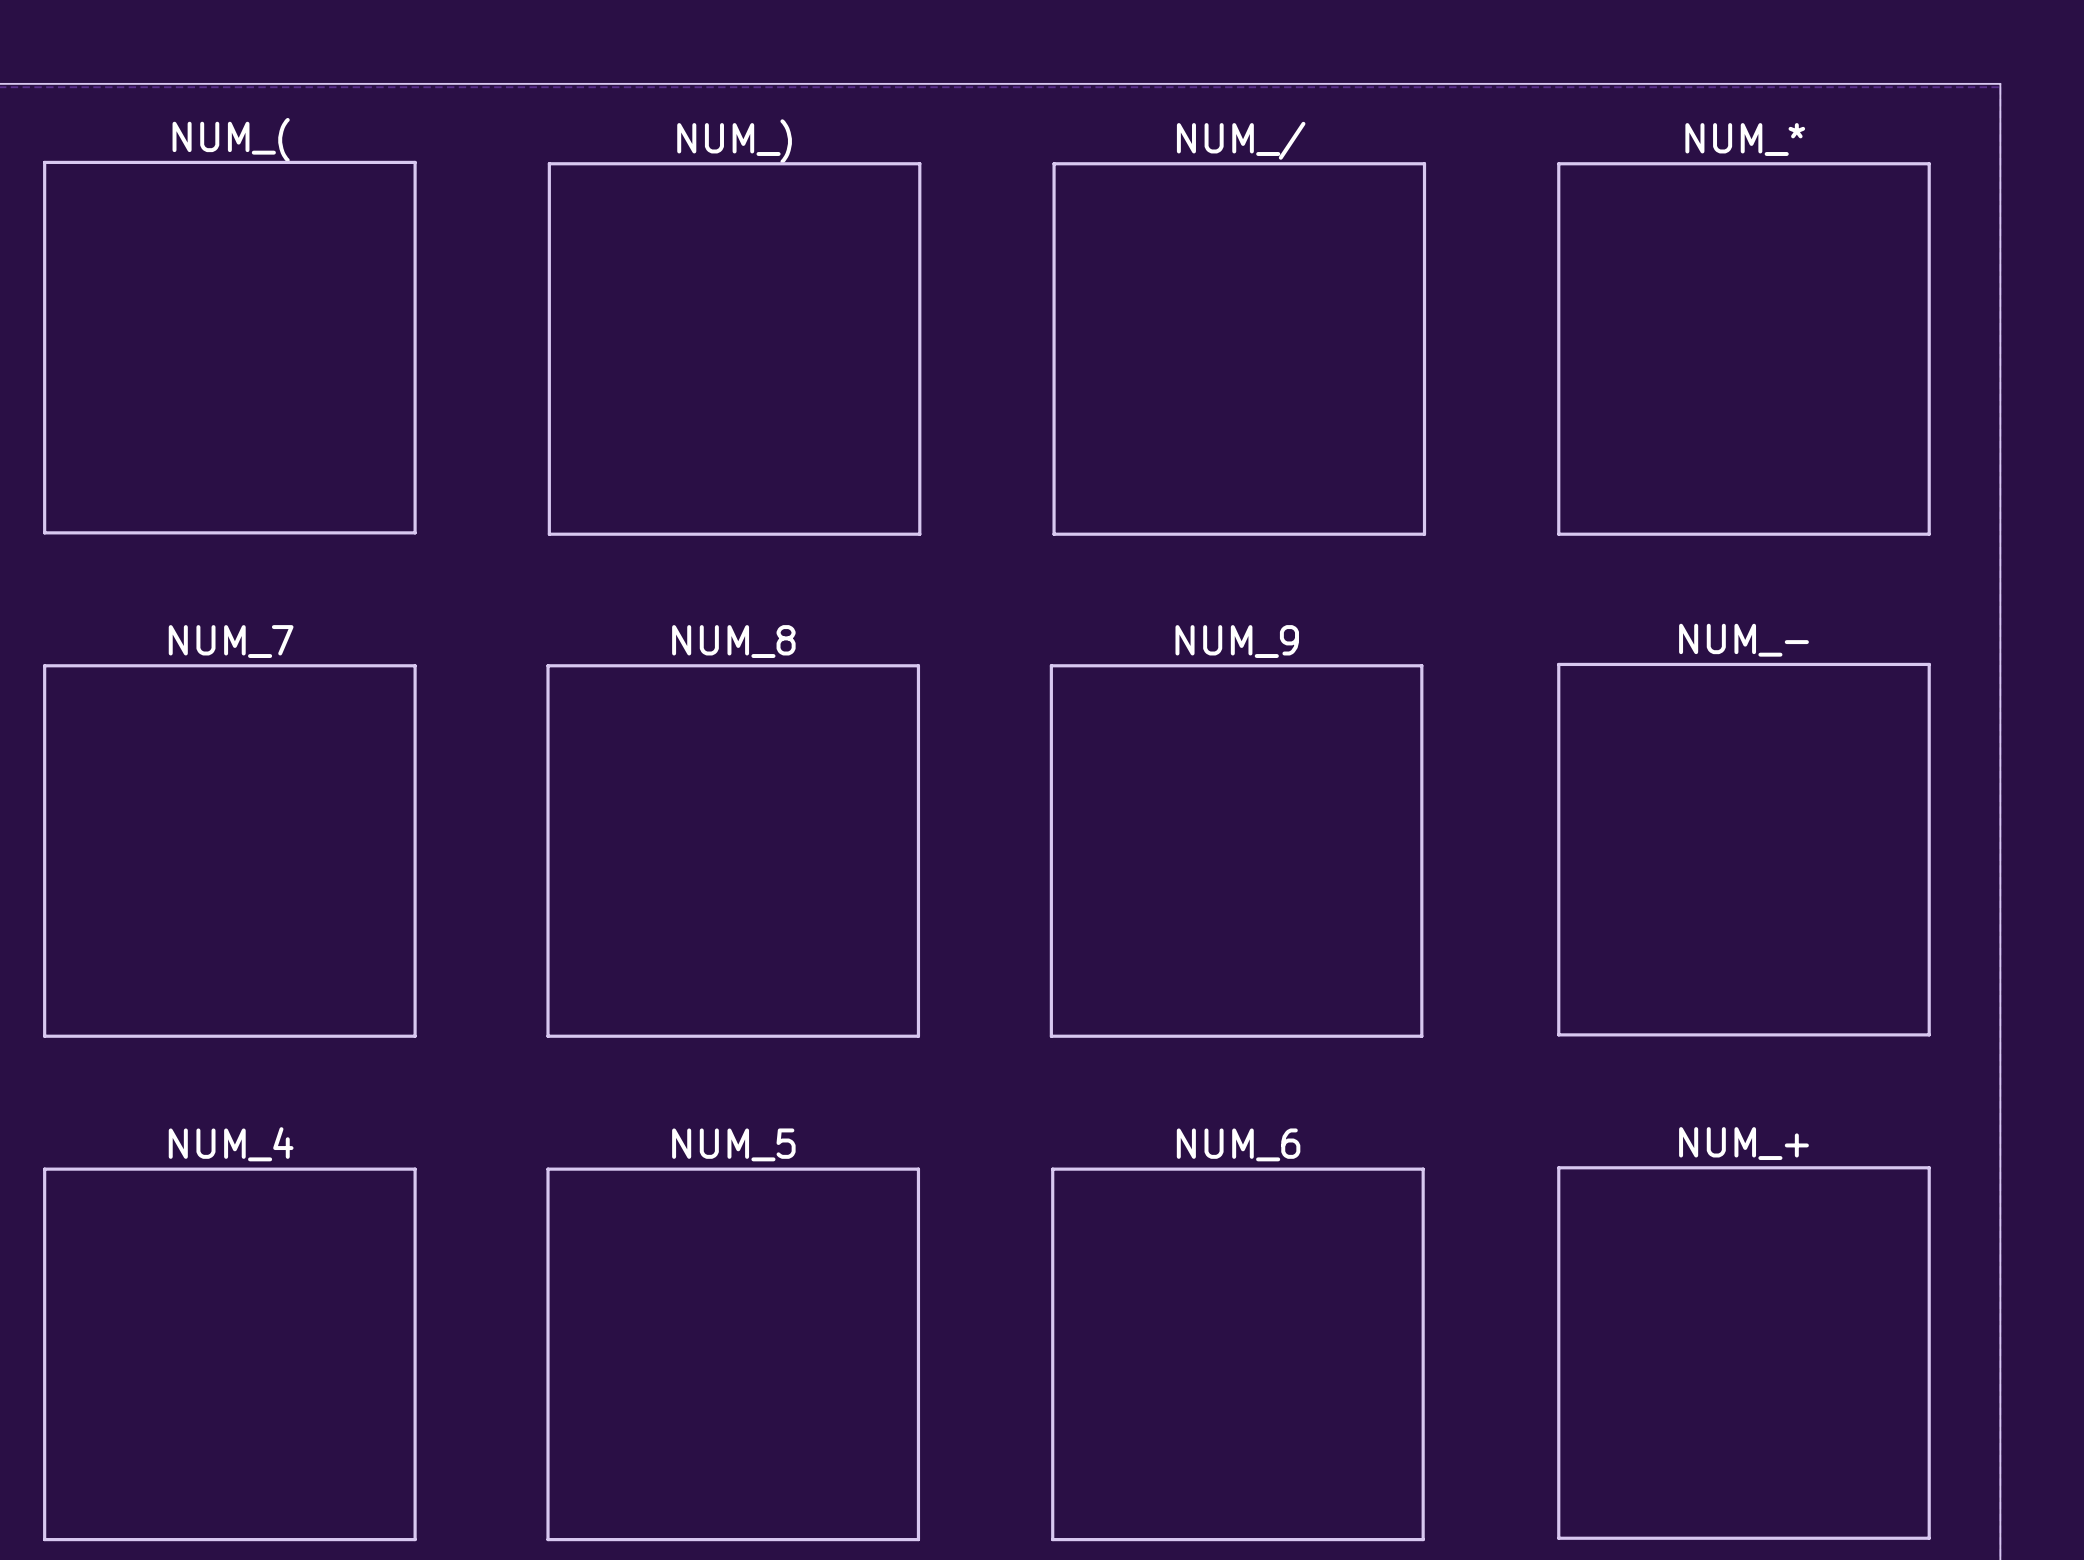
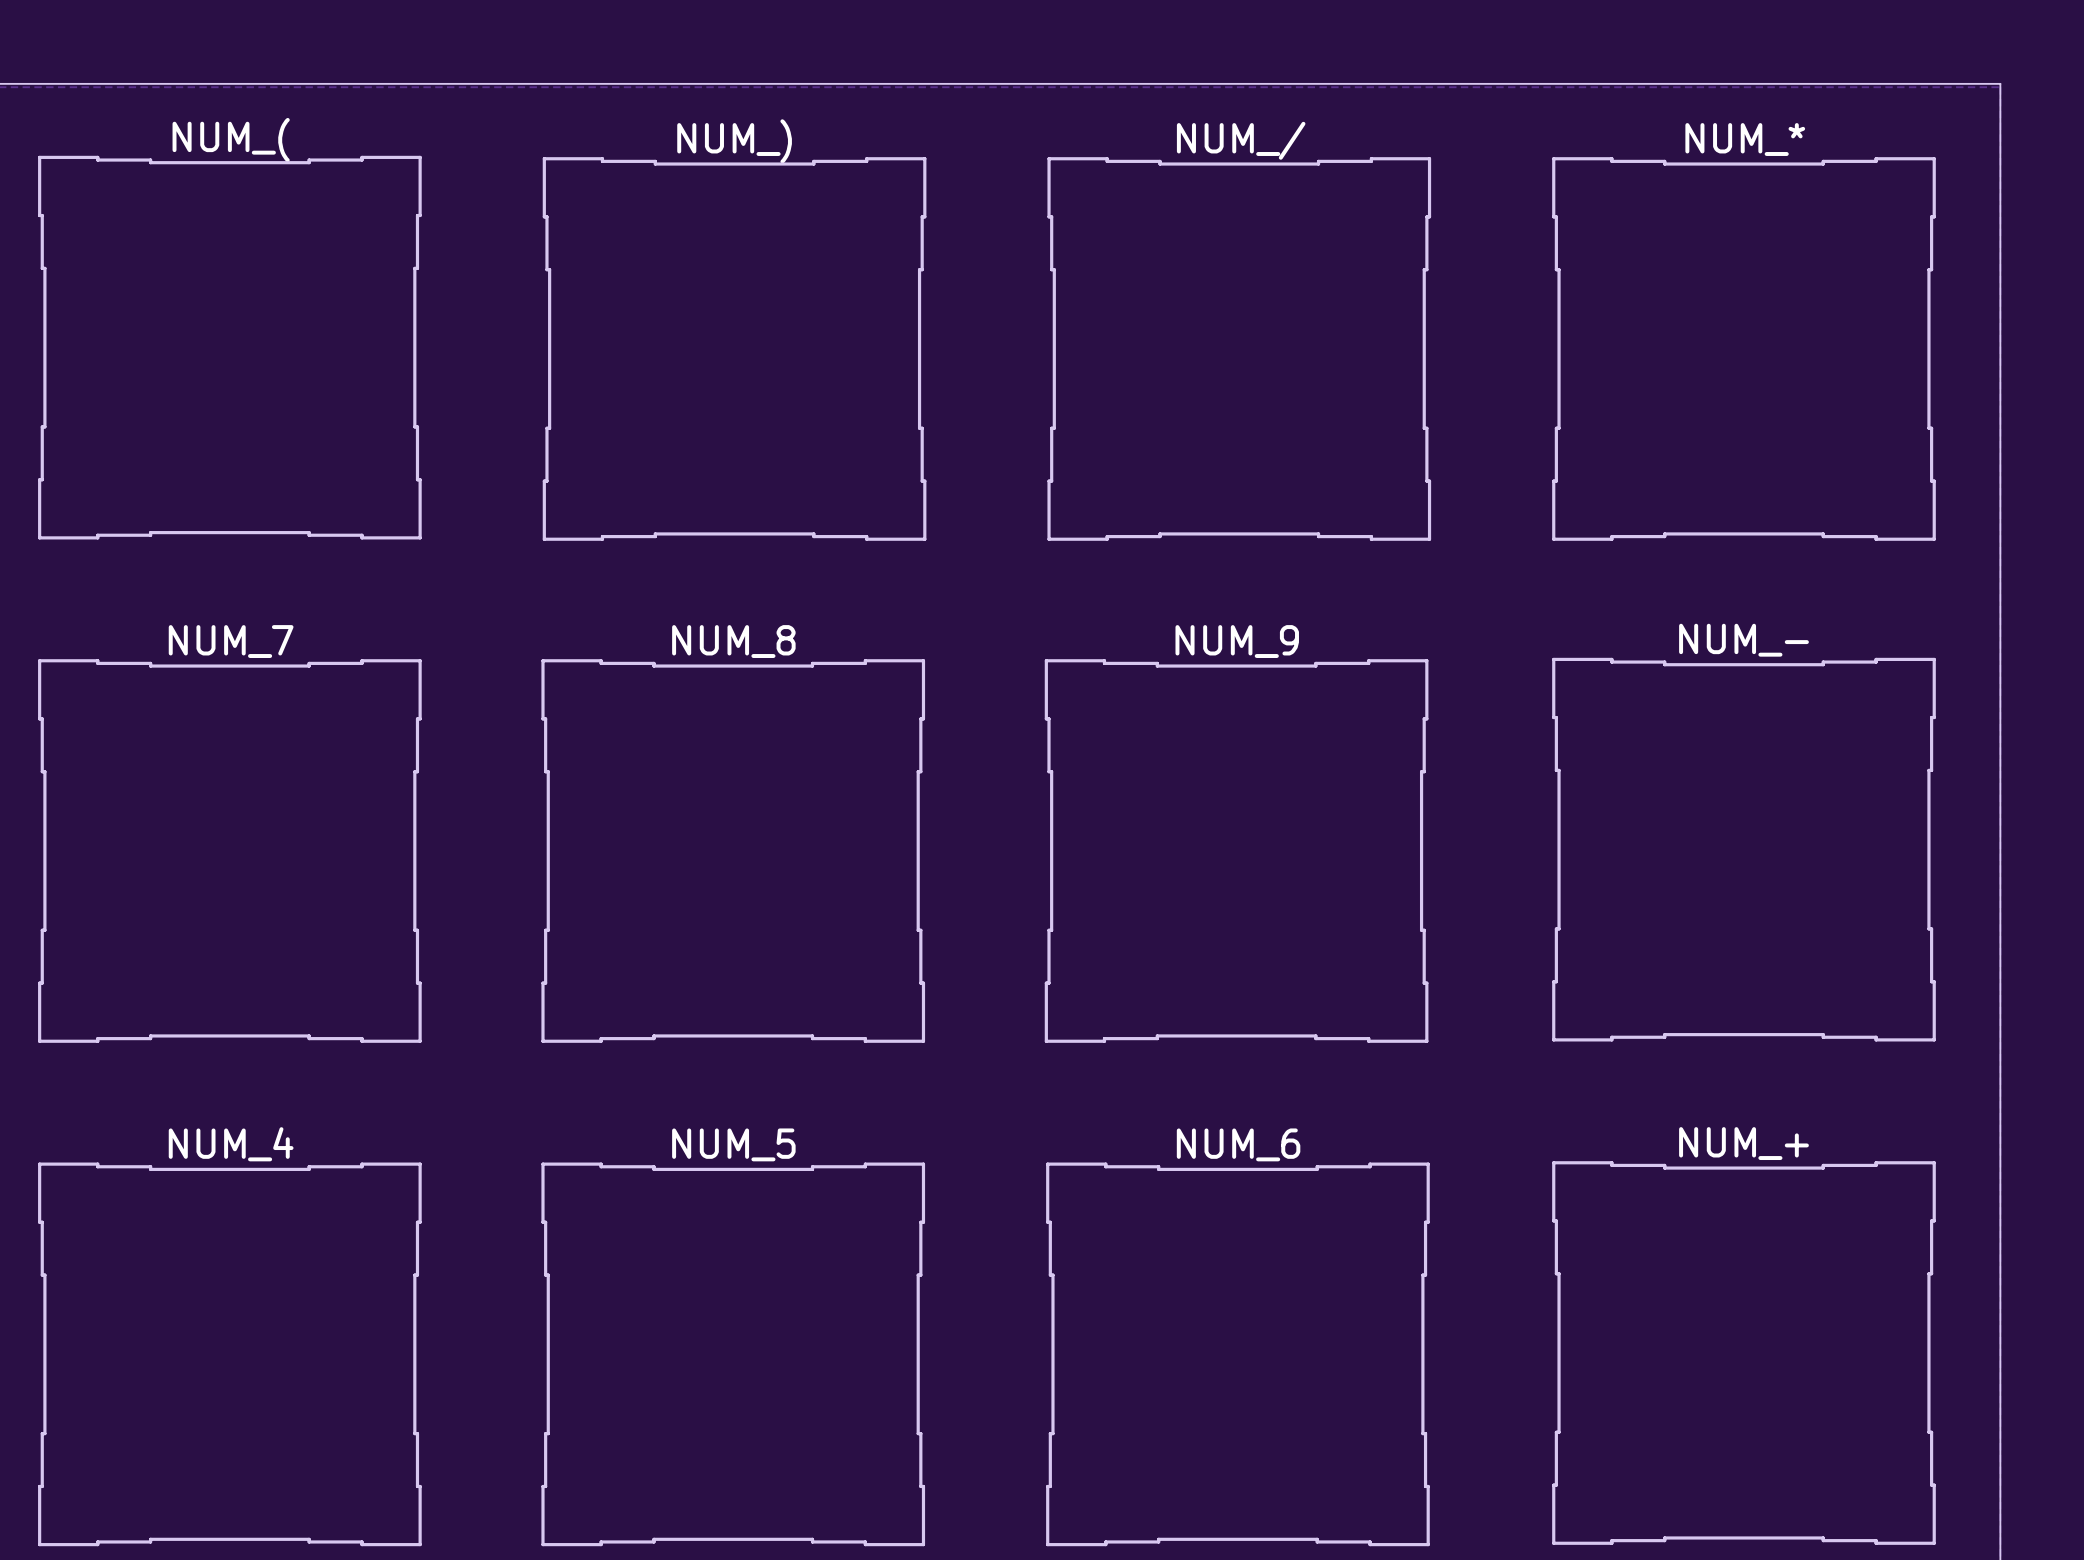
drawing shape: [43, 117, 417, 535] -> [38, 117, 422, 540]
drawing shape: [547, 119, 922, 536] -> [542, 119, 927, 541]
drawing shape: [1052, 121, 1427, 536] -> [1047, 121, 1432, 541]
drawing shape: [1557, 123, 1931, 536] -> [1552, 123, 1936, 541]
drawing shape: [1557, 623, 1931, 1037] -> [1552, 623, 1936, 1042]
drawing shape: [43, 625, 417, 1038] -> [38, 625, 422, 1043]
drawing shape: [546, 625, 921, 1038] -> [541, 625, 926, 1043]
drawing shape: [1049, 625, 1424, 1038] -> [1044, 625, 1429, 1043]
drawing shape: [43, 1127, 417, 1542] -> [38, 1127, 422, 1547]
drawing shape: [1557, 1127, 1931, 1540] -> [1552, 1127, 1936, 1545]
drawing shape: [546, 1128, 921, 1542] -> [541, 1128, 926, 1547]
drawing shape: [1051, 1128, 1425, 1542] -> [1046, 1128, 1430, 1547]

